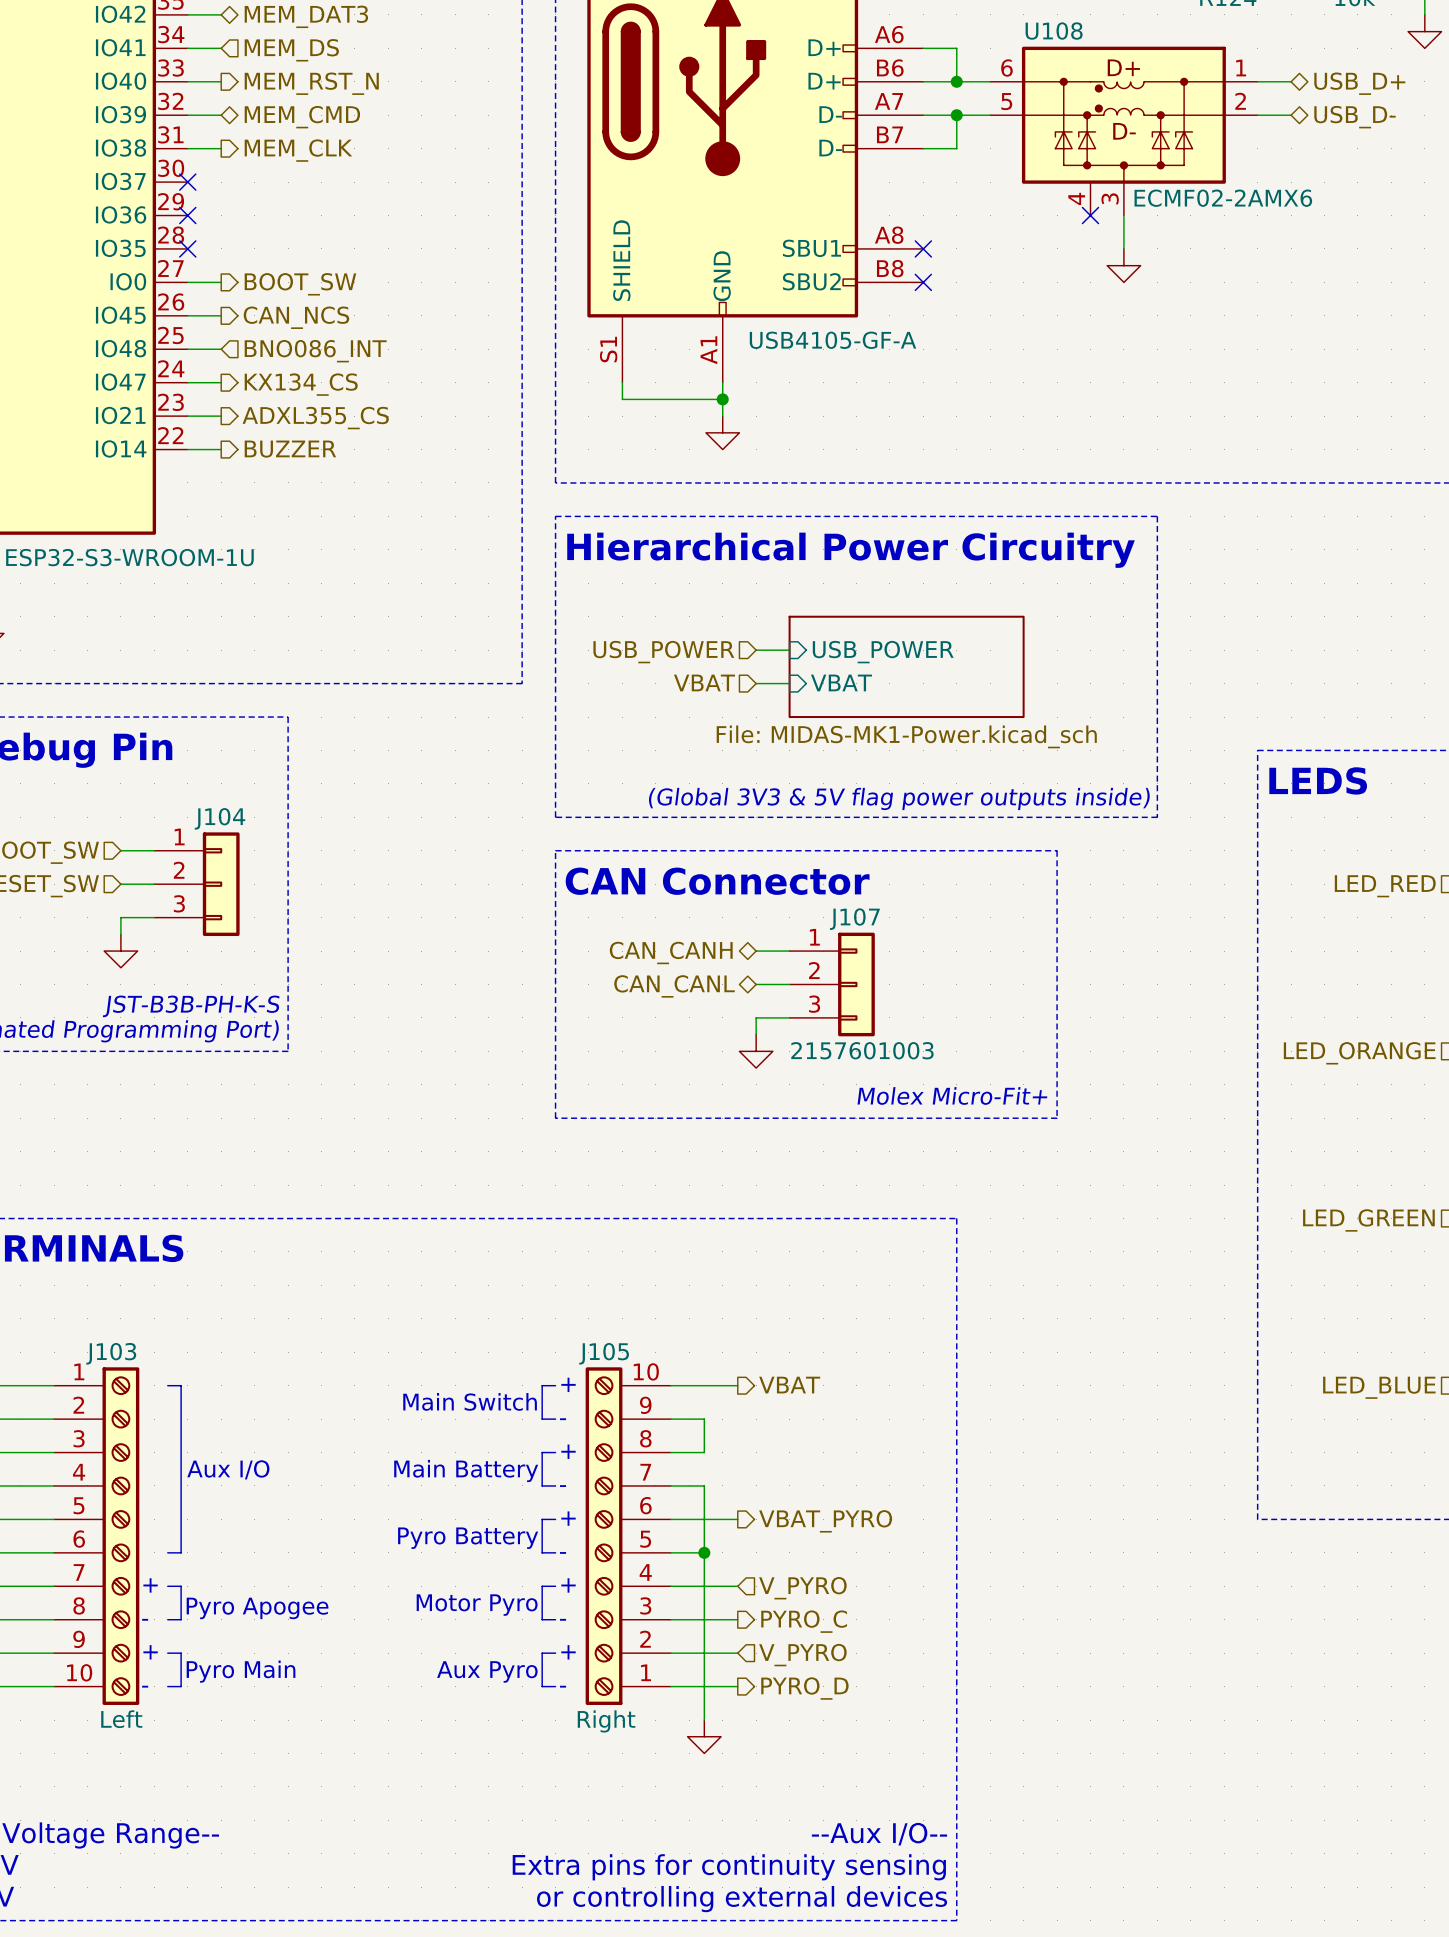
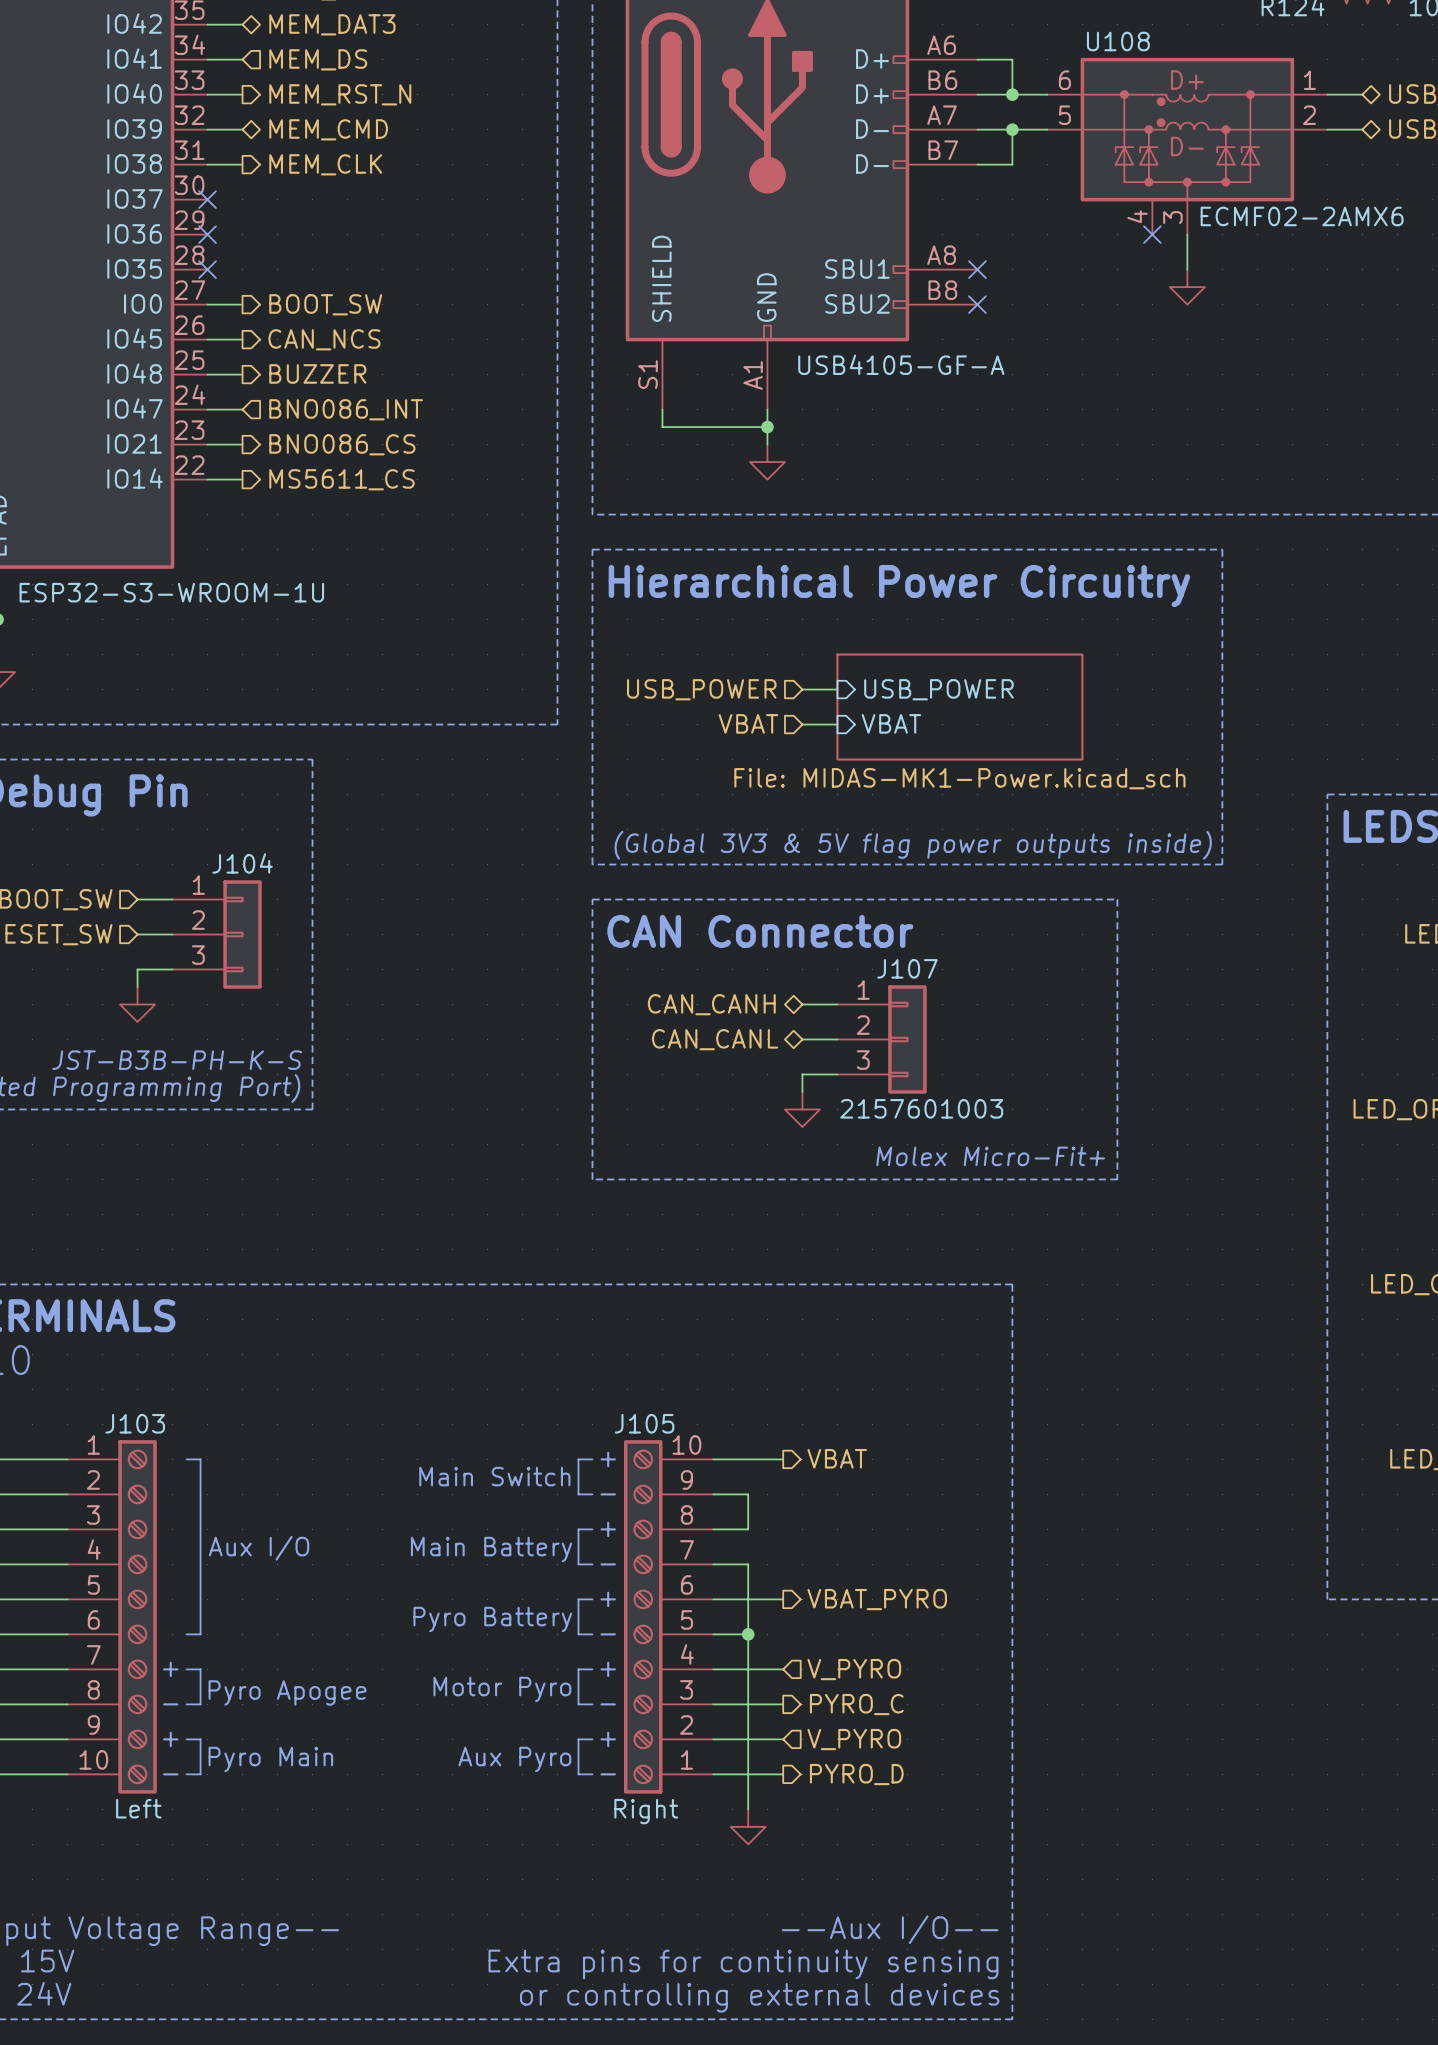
hierarchical label shape: input (315, 351) -> output (317, 373)
hierarchical label: BNO086_INT (315, 351) -> BUZZER (317, 373)
hierarchical label shape: output (301, 384) -> input (346, 409)
hierarchical label: KX134_CS (301, 384) -> BNO086_INT (346, 409)
hierarchical label: ADXL355_CS (315, 418) -> BNO086_CS (342, 444)
hierarchical label: BUZZER (290, 449) -> MS5611_CS (341, 479)

